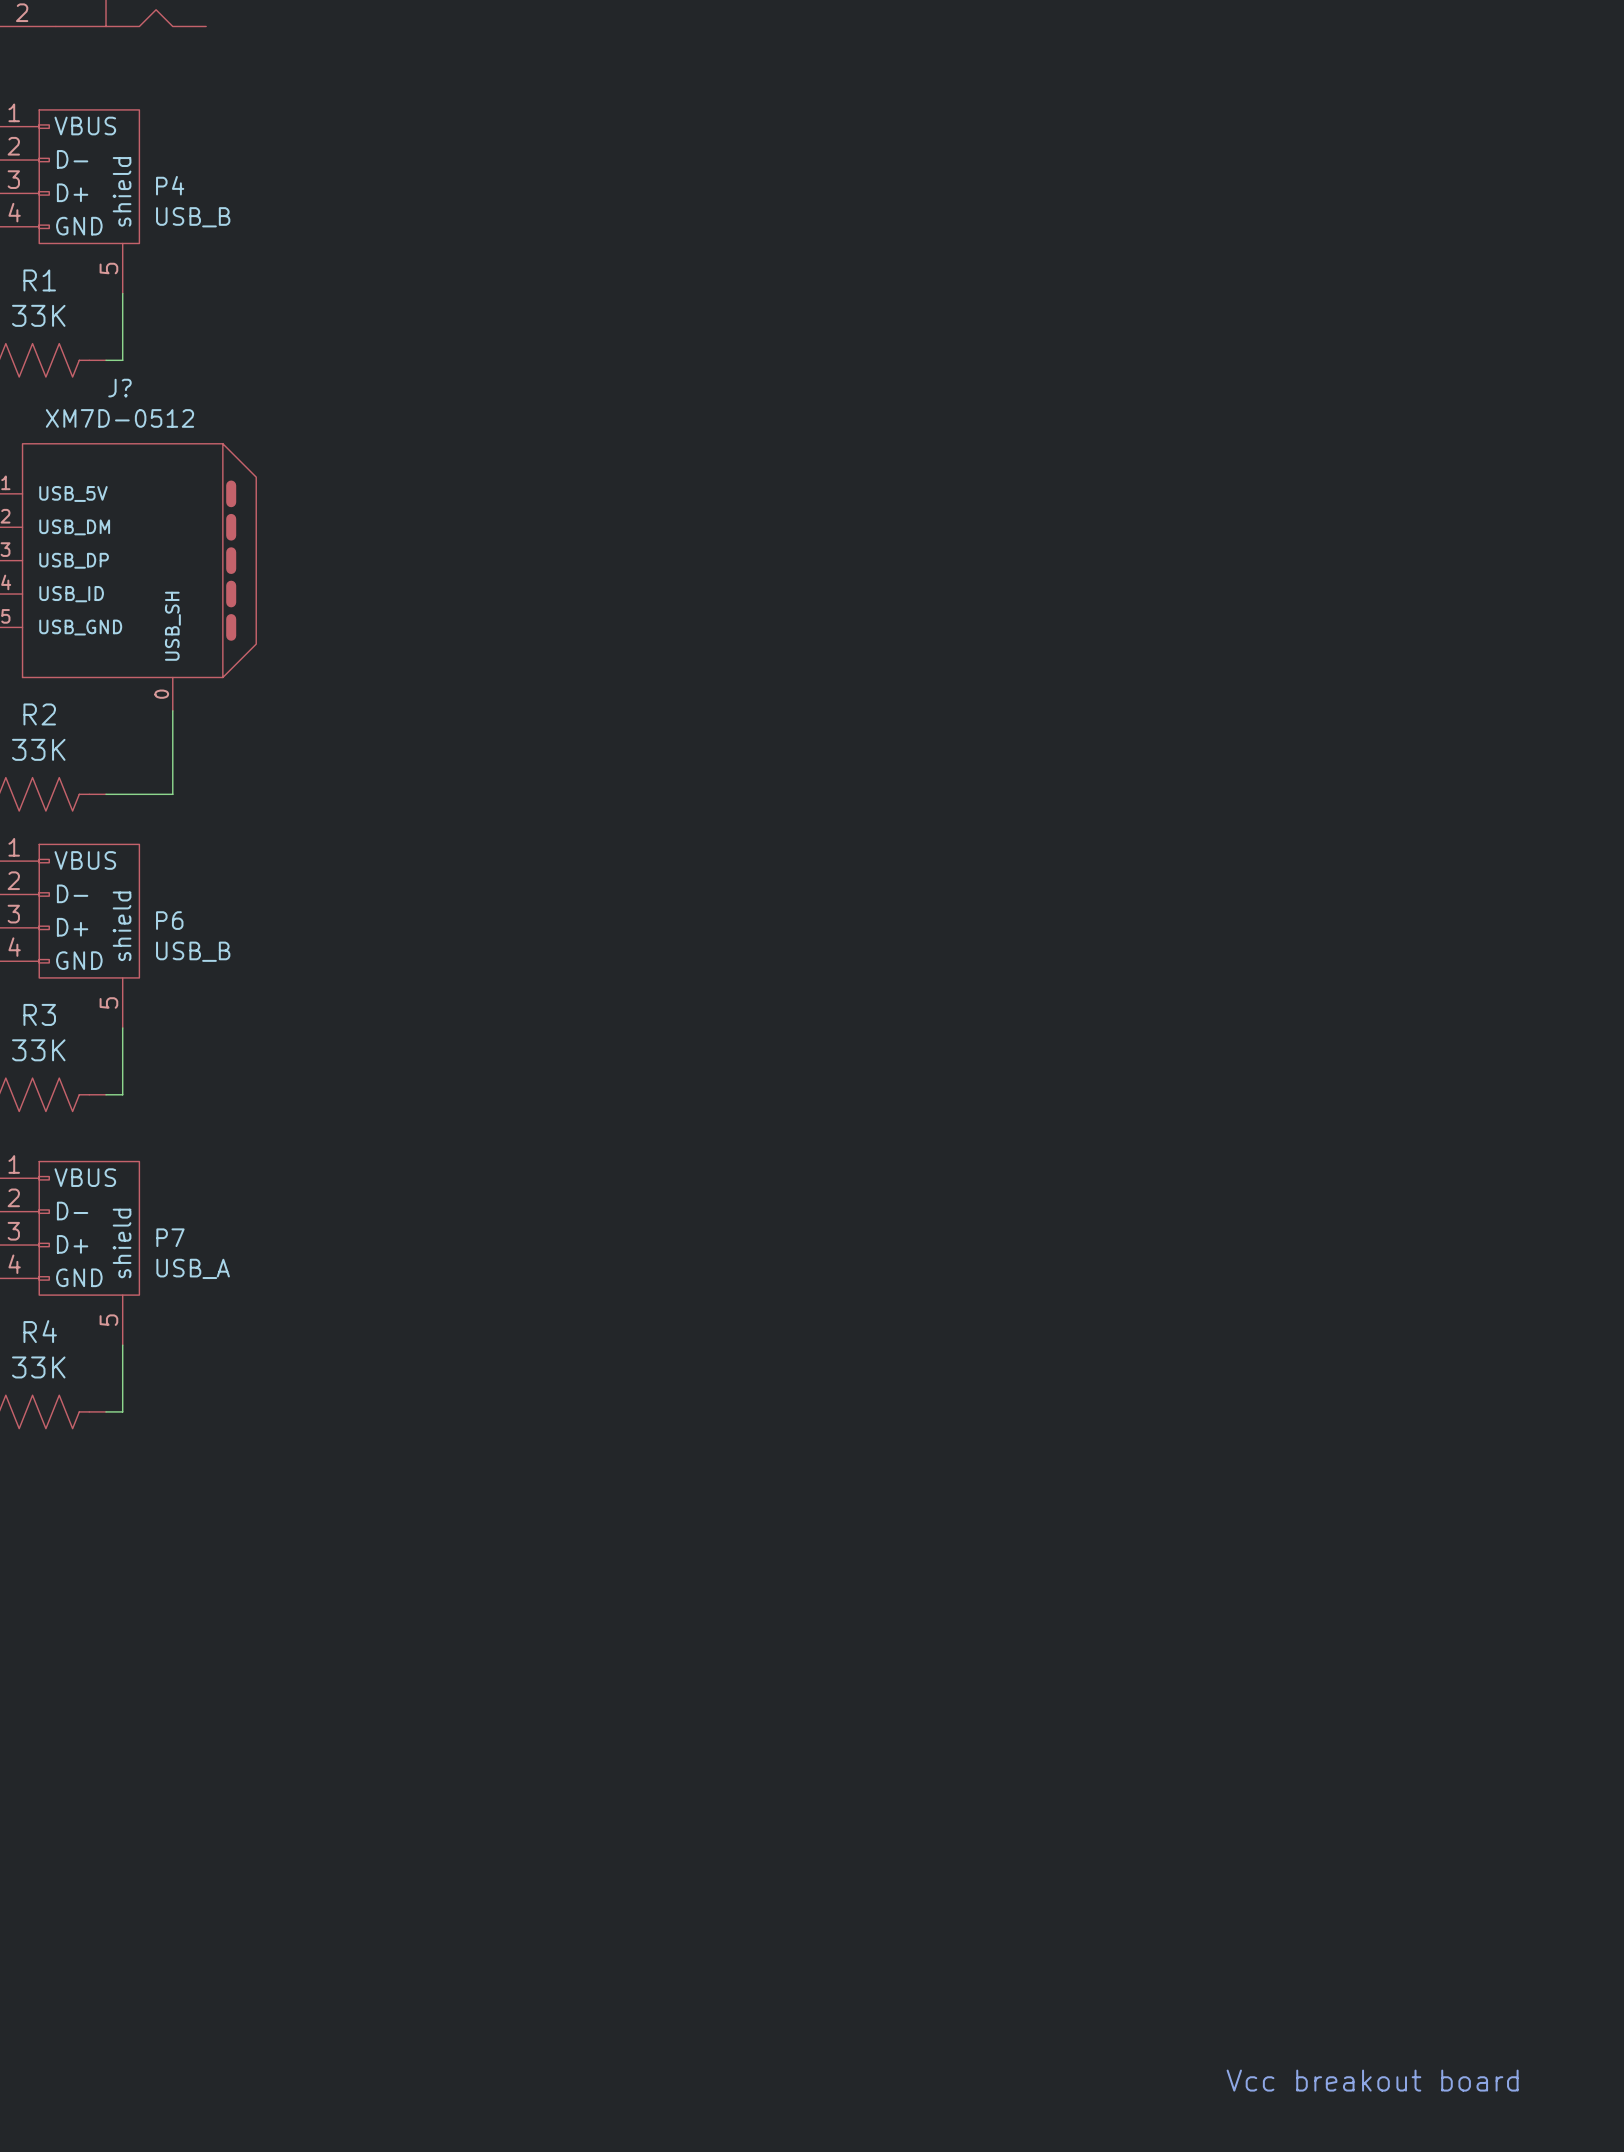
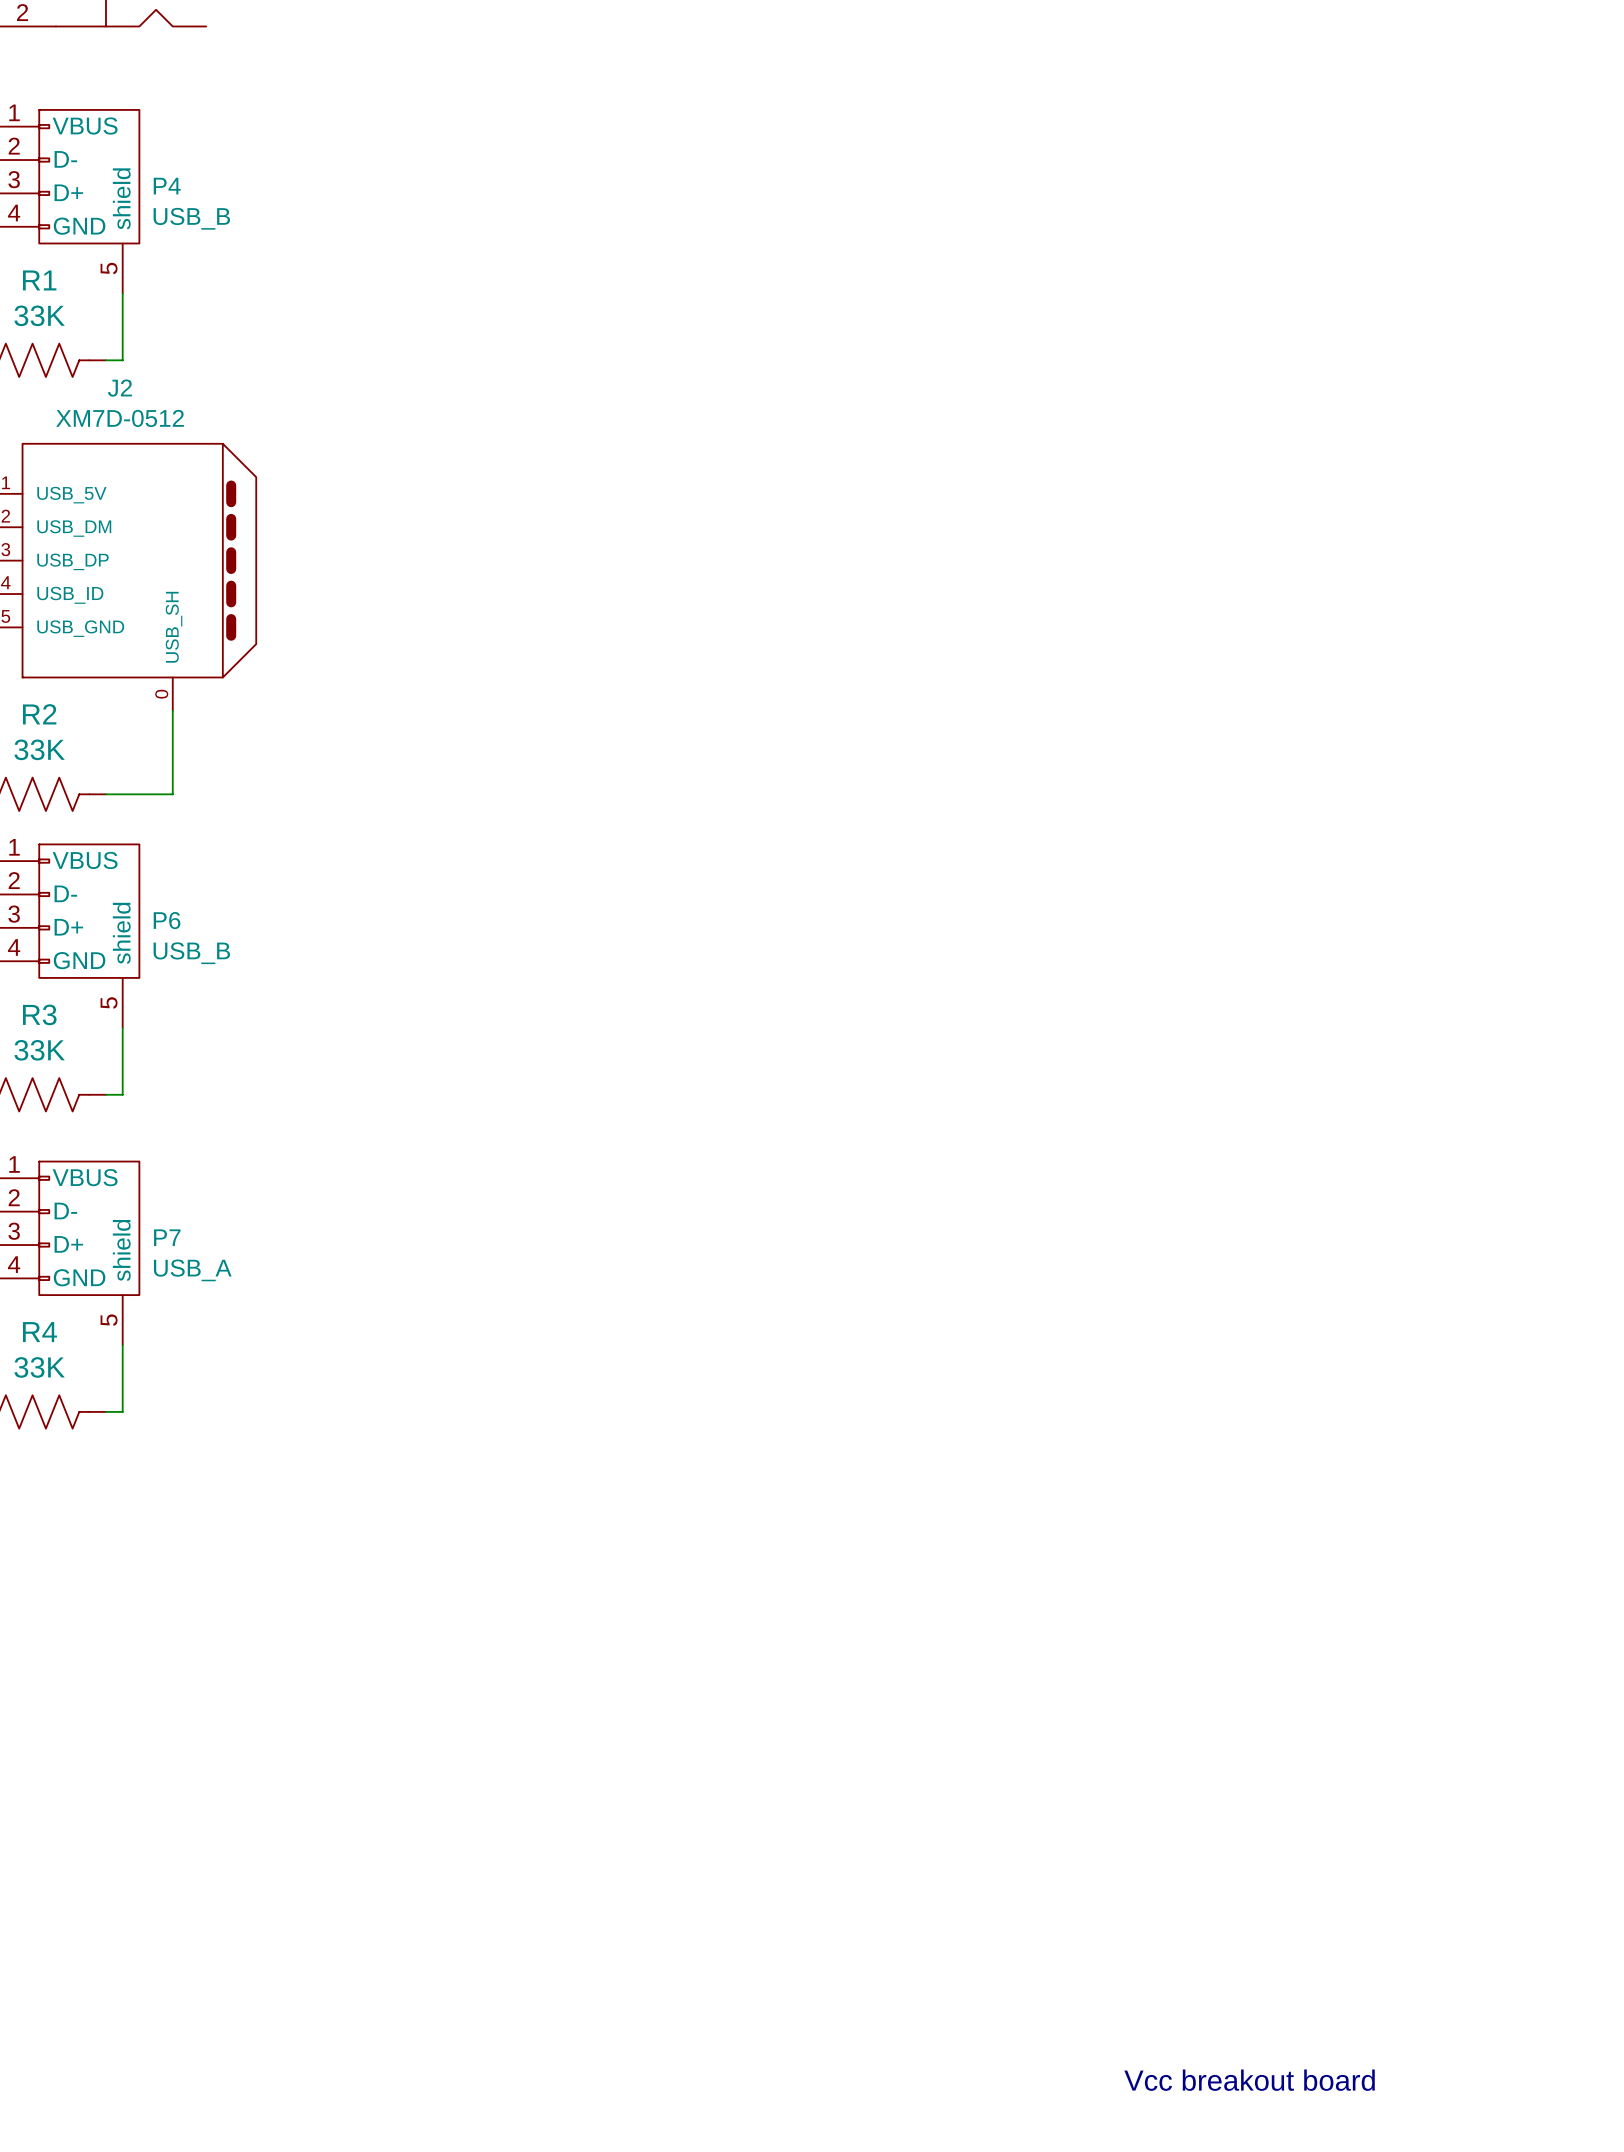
J? name: J? (119, 388) -> J2 (119, 388)
text position: Vcc breakout board (1372, 2080) -> Vcc breakout board (1249, 2080)

